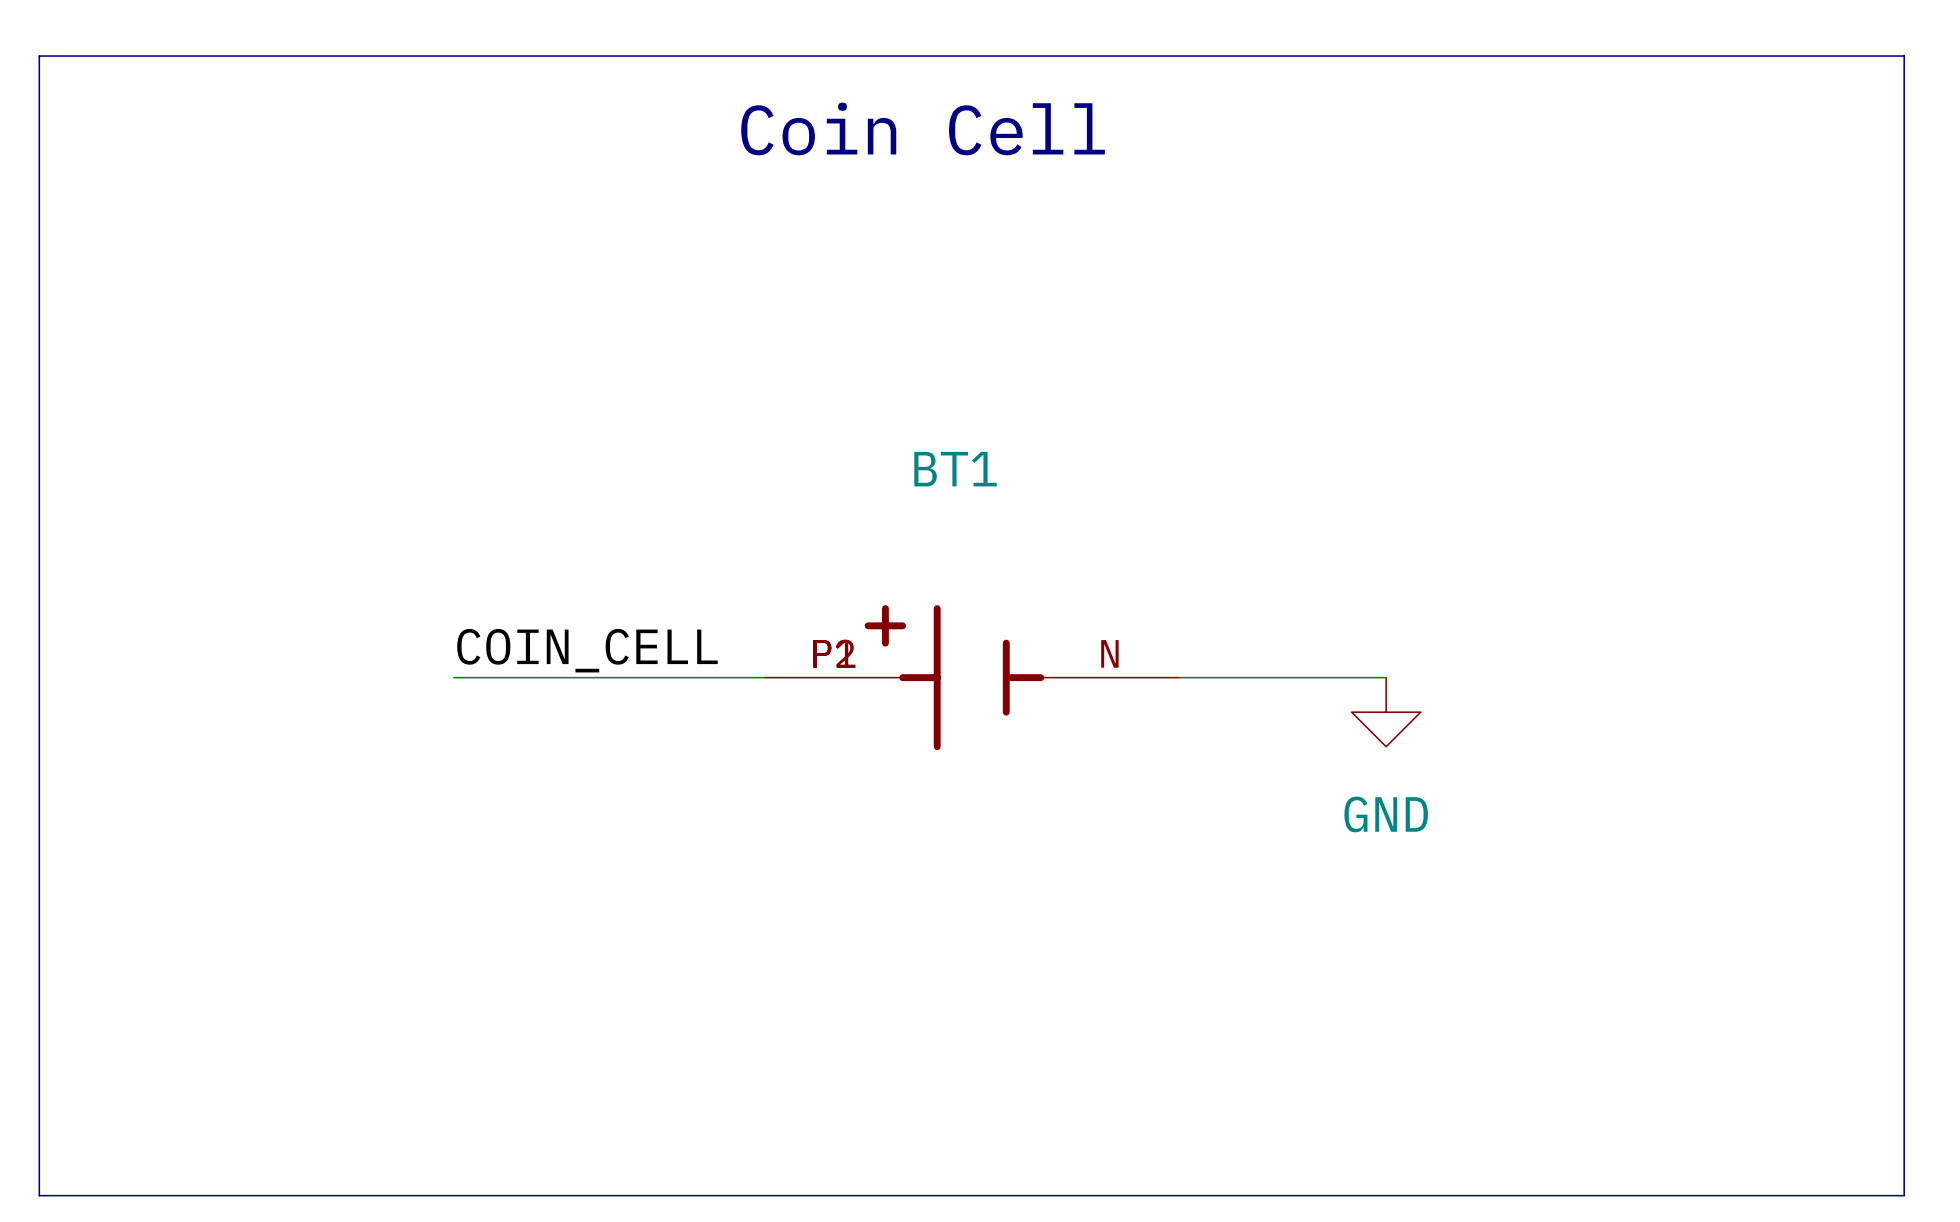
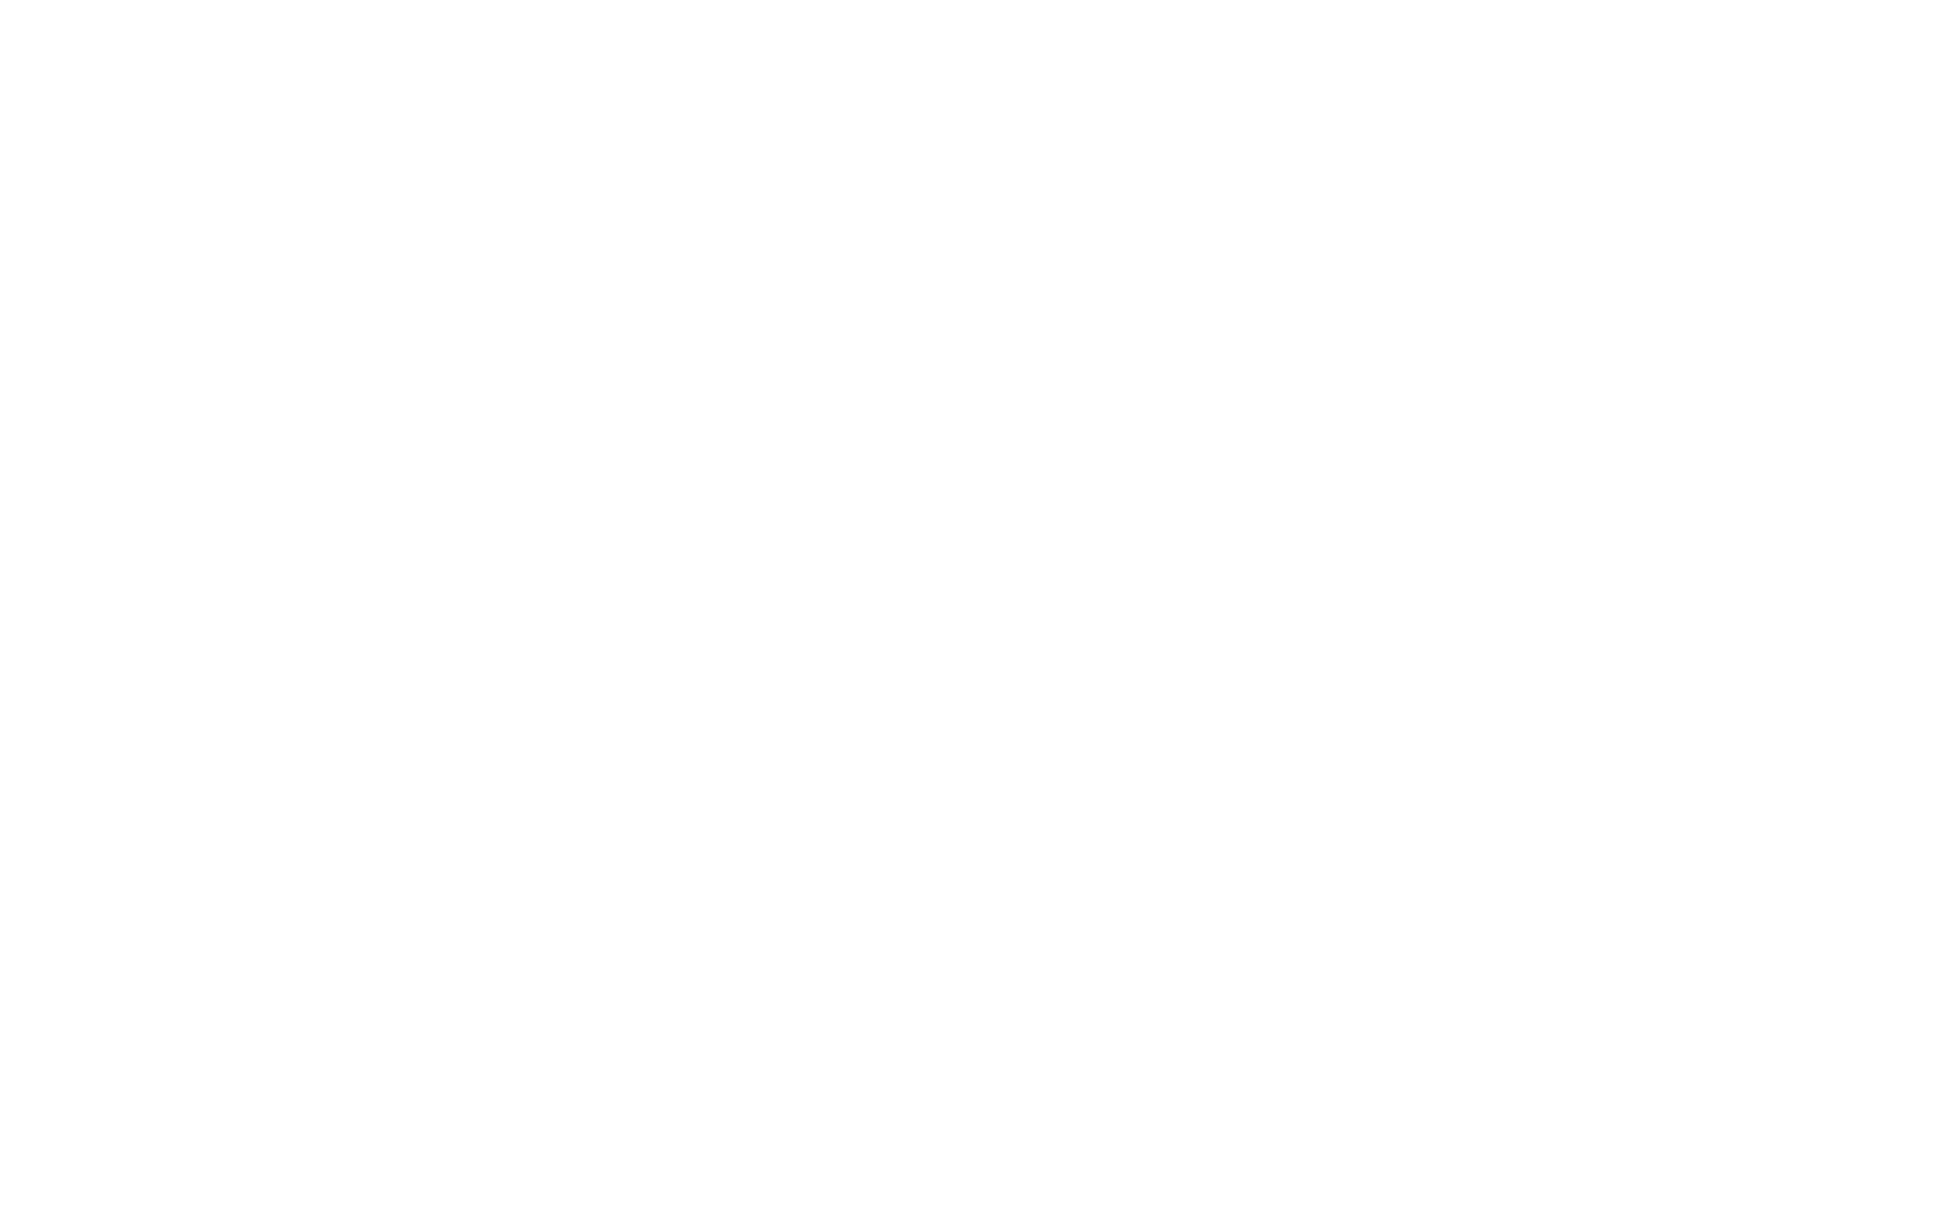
line: (39, 56) (1904, 56) (1904, 1195) (39, 1195) (39, 56) -> none
text: Coin Cell (923, 128) -> none
label: COIN_CELL (587, 650) -> none
wire: (453, 677) (764, 677) -> none
BT1: (971, 677) -> none
wire: (1178, 677) (1386, 677) -> none
power symbol: GND (1386, 712) -> none

